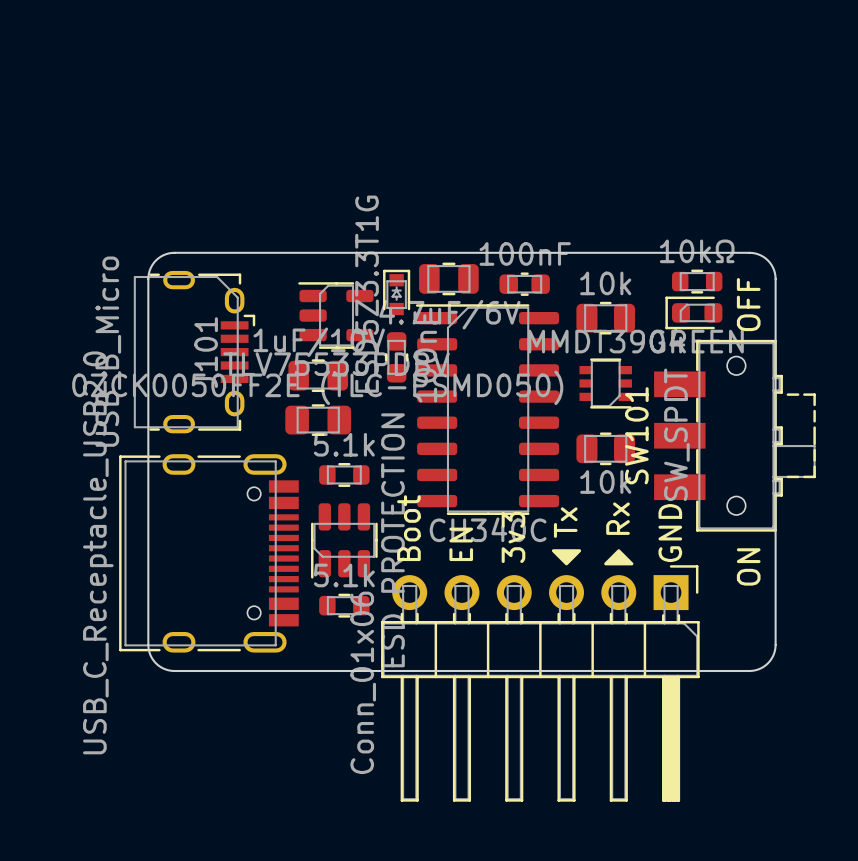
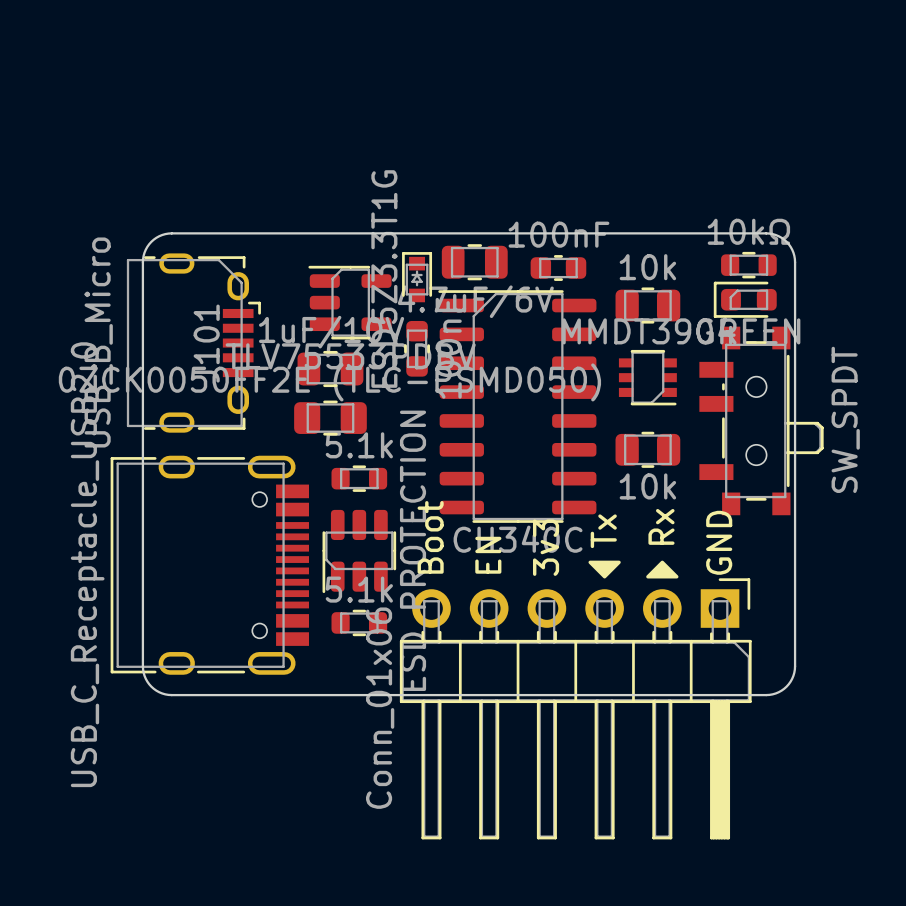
board edge: (712, 252) (749, 252) (760, 255) (771, 265) (775, 278) (775, 647) (769, 661) (758, 669) (712, 670) -> (766, 233) (775, 235) (786, 241) (793, 252) (795, 262) (794, 669) (792, 678) (786, 686) (778, 692) (766, 695)
text: OFF (748, 304) -> none
part: none -> SW_SPDT (761, 420)
SW101: SW_SPDT (734, 435) -> none
text: ON (748, 566) -> none

